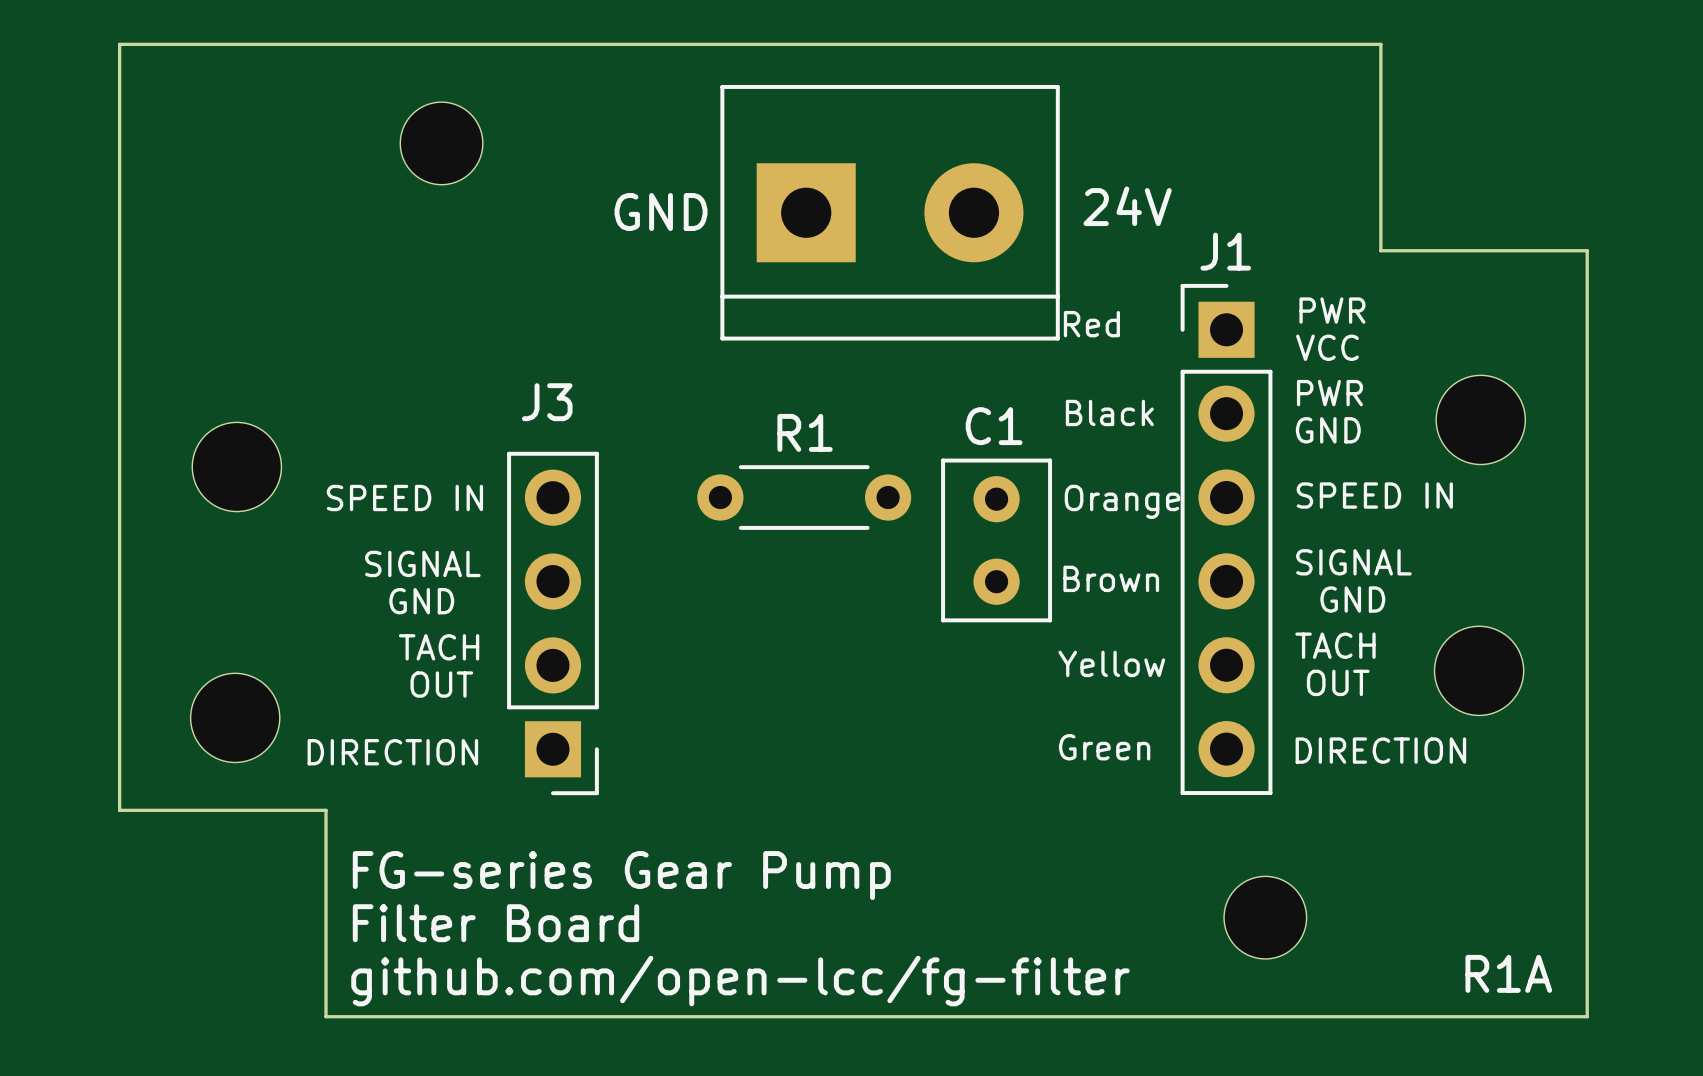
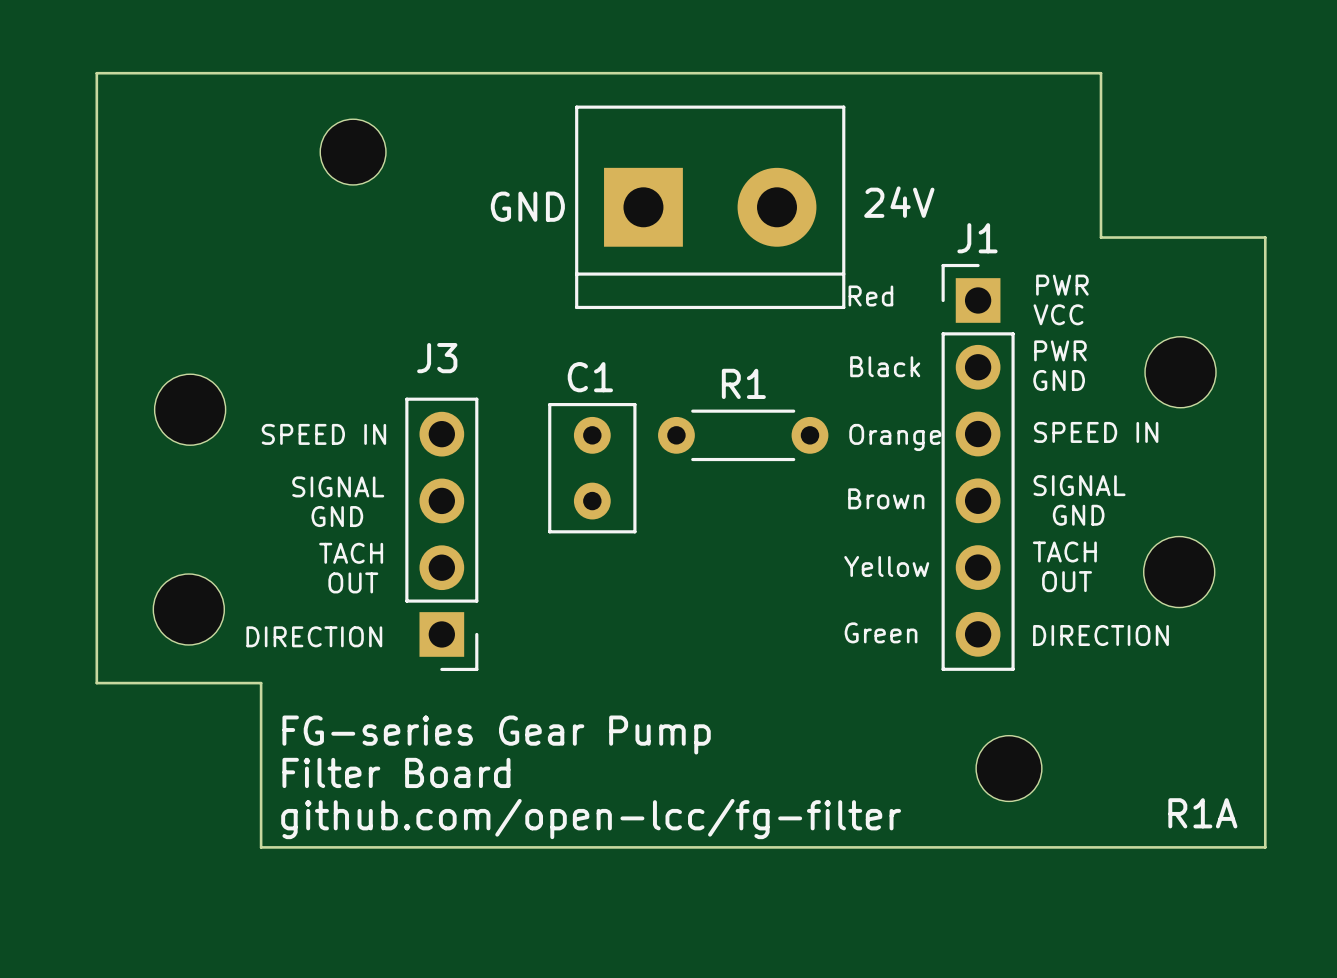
R1 position: (804, 497) -> (743, 435)
C1 position: (996, 540) -> (592, 468)

